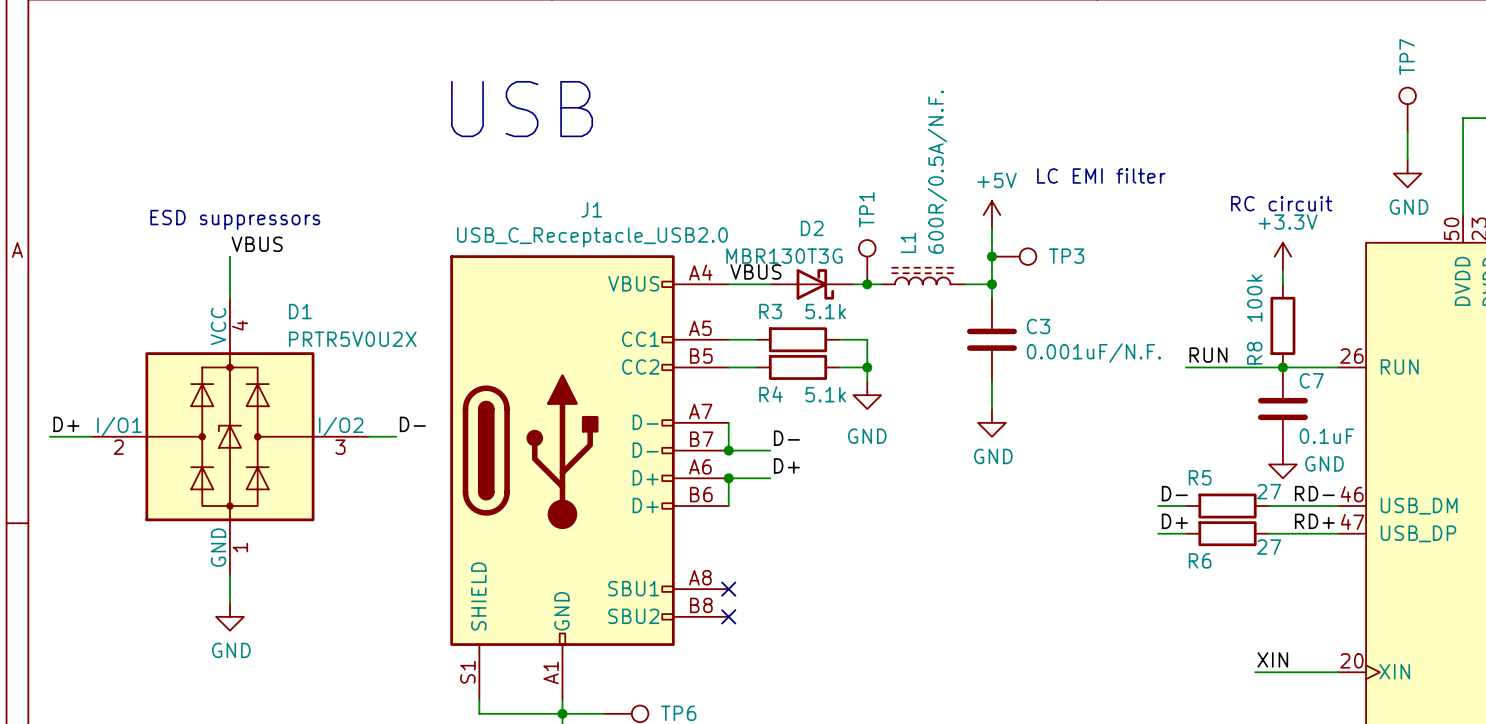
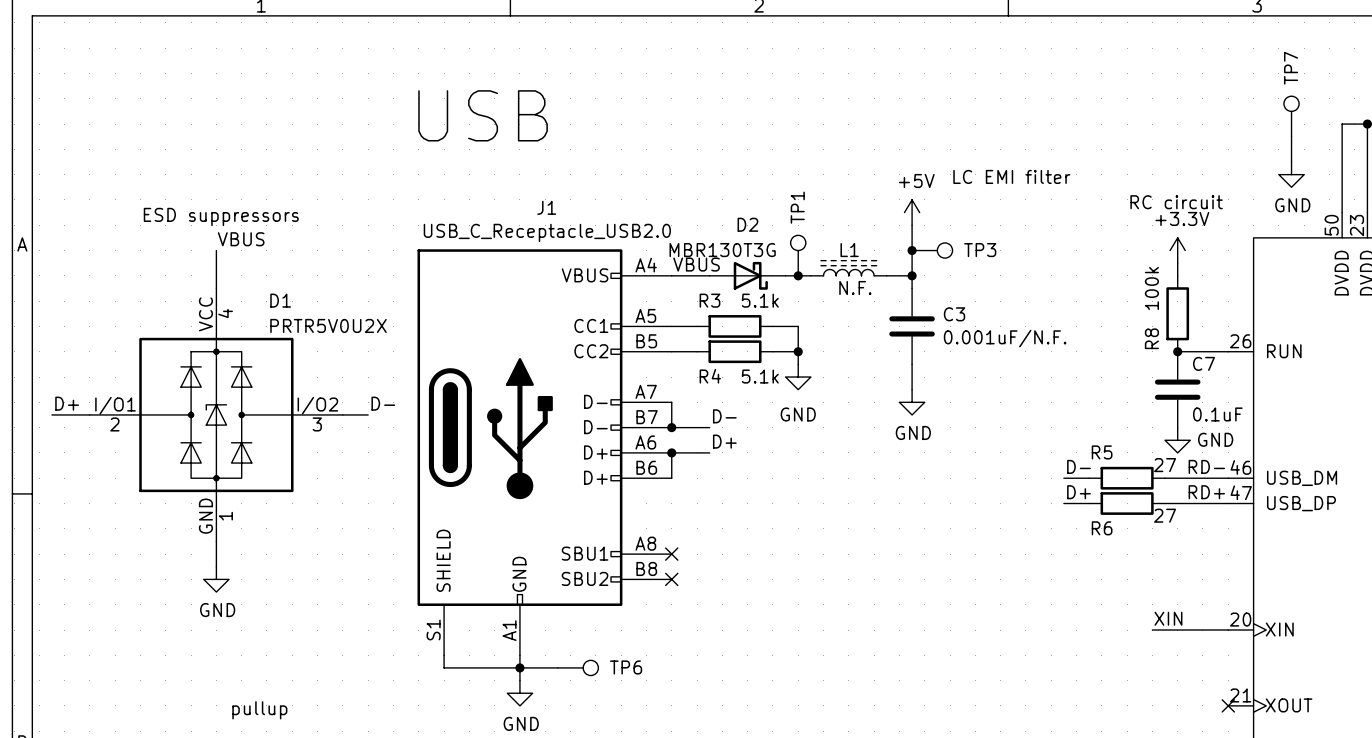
L1 value: 600R/0.5A/N.F. (937, 172) -> N.F. (855, 288)
L1 name rotation: 0° (908, 243) -> 90° clockwise (849, 250)
label: RUN (1208, 355) -> none
wire: (1185, 367) (1282, 367) -> none

